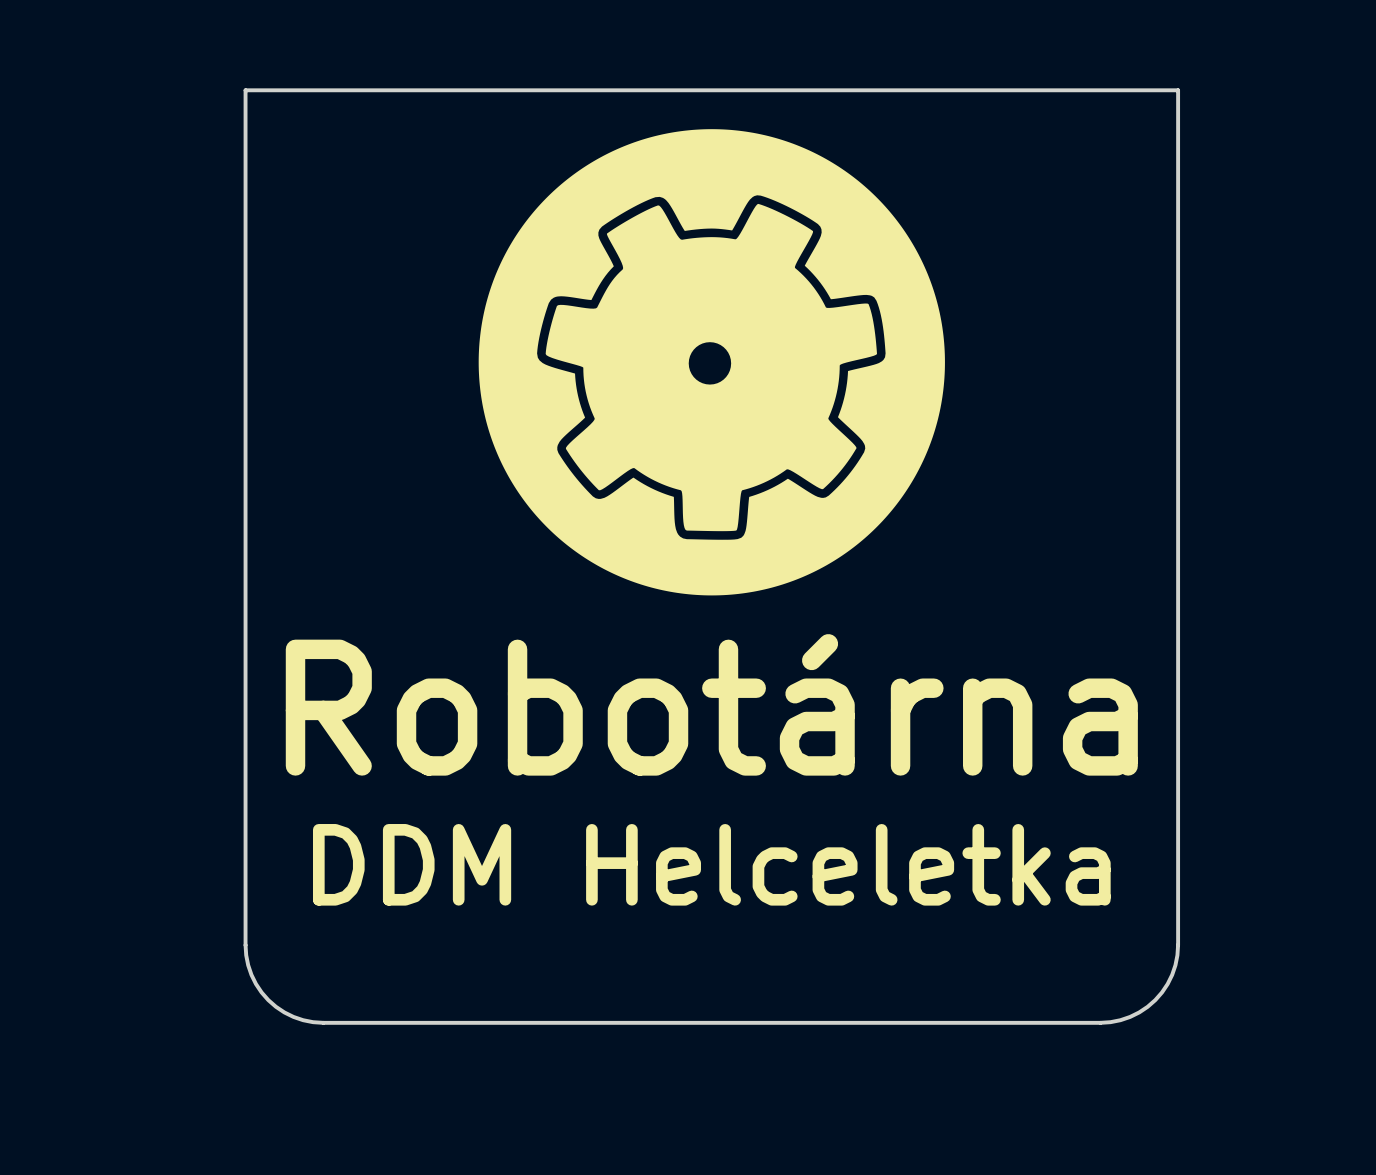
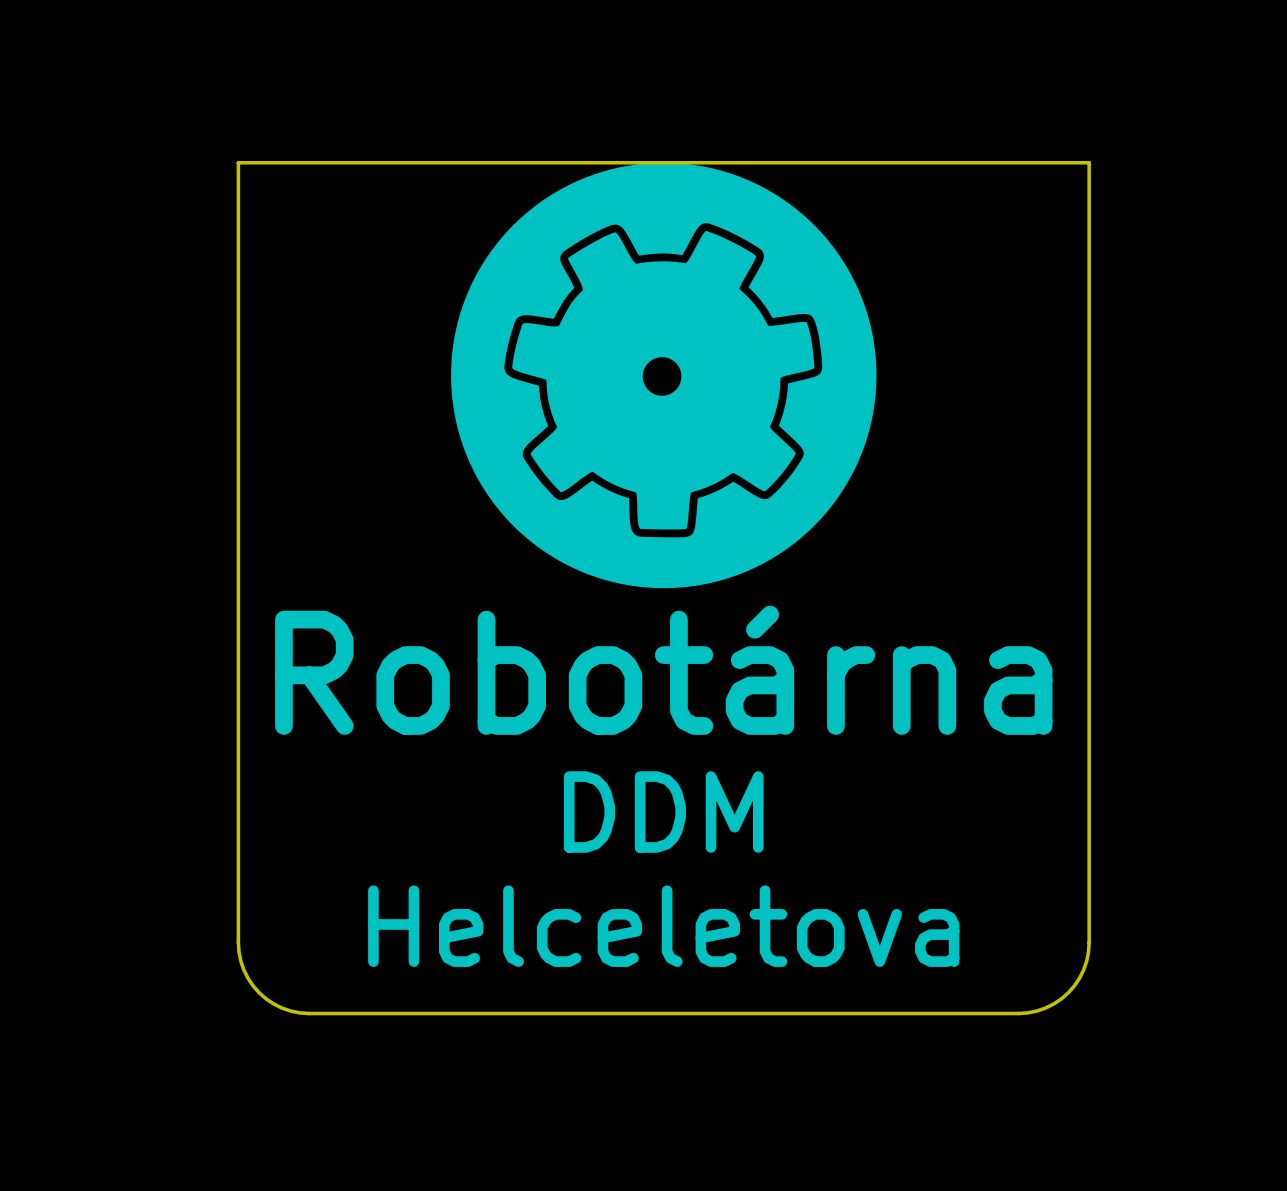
drawing position: (711, 362) -> (663, 375)
text position: Robotárna (711, 704) -> Robotárna (663, 670)
text: none -> DDM (663, 812)
text: DDM Helceletka (711, 864) -> Helceletova (663, 926)

